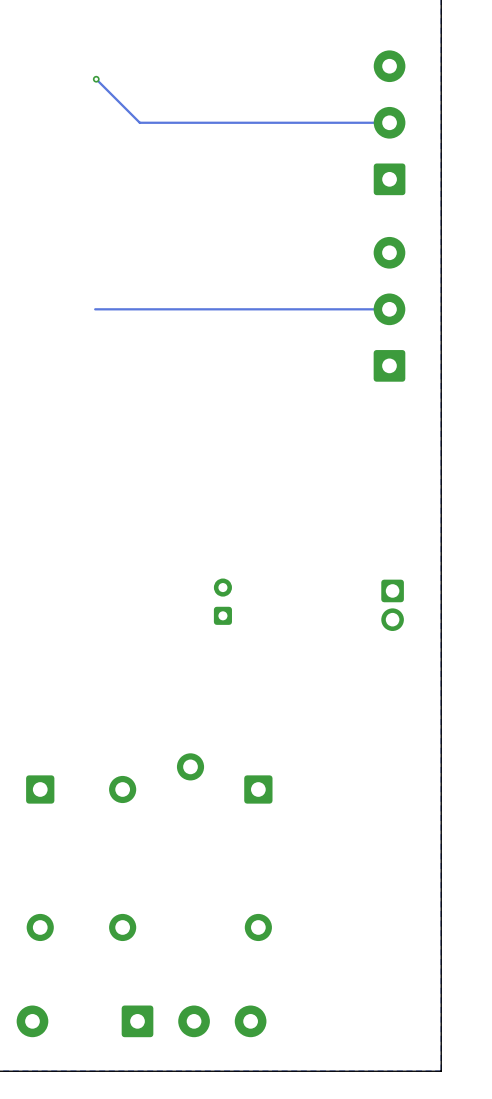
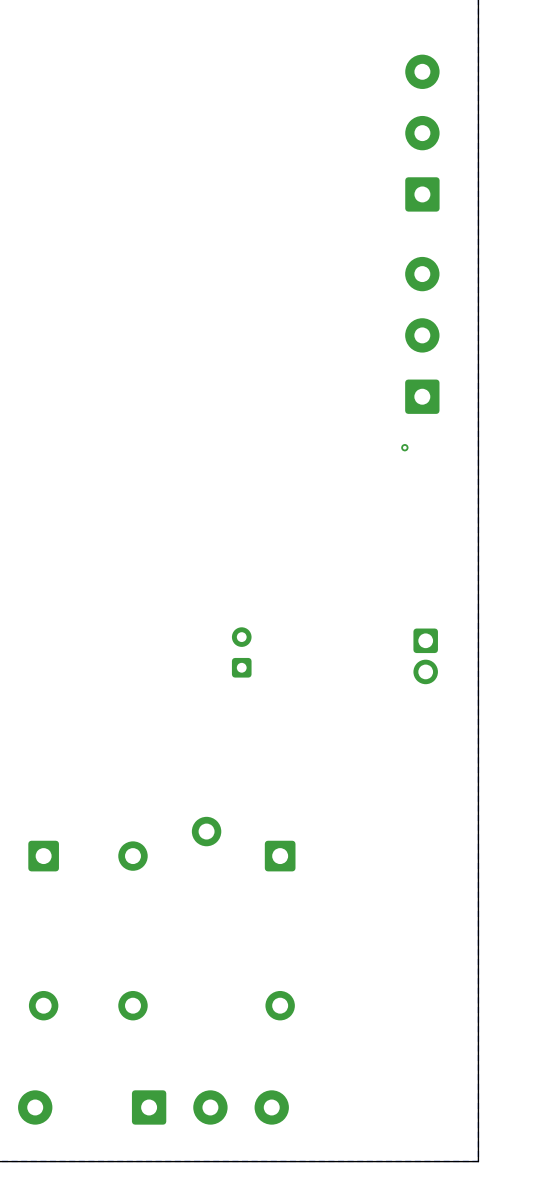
track: (96, 79) (139, 122) (389, 122) -> none
via: (96, 79) -> none
track: (389, 309) (95, 309) -> none
via: none -> (404, 447)

